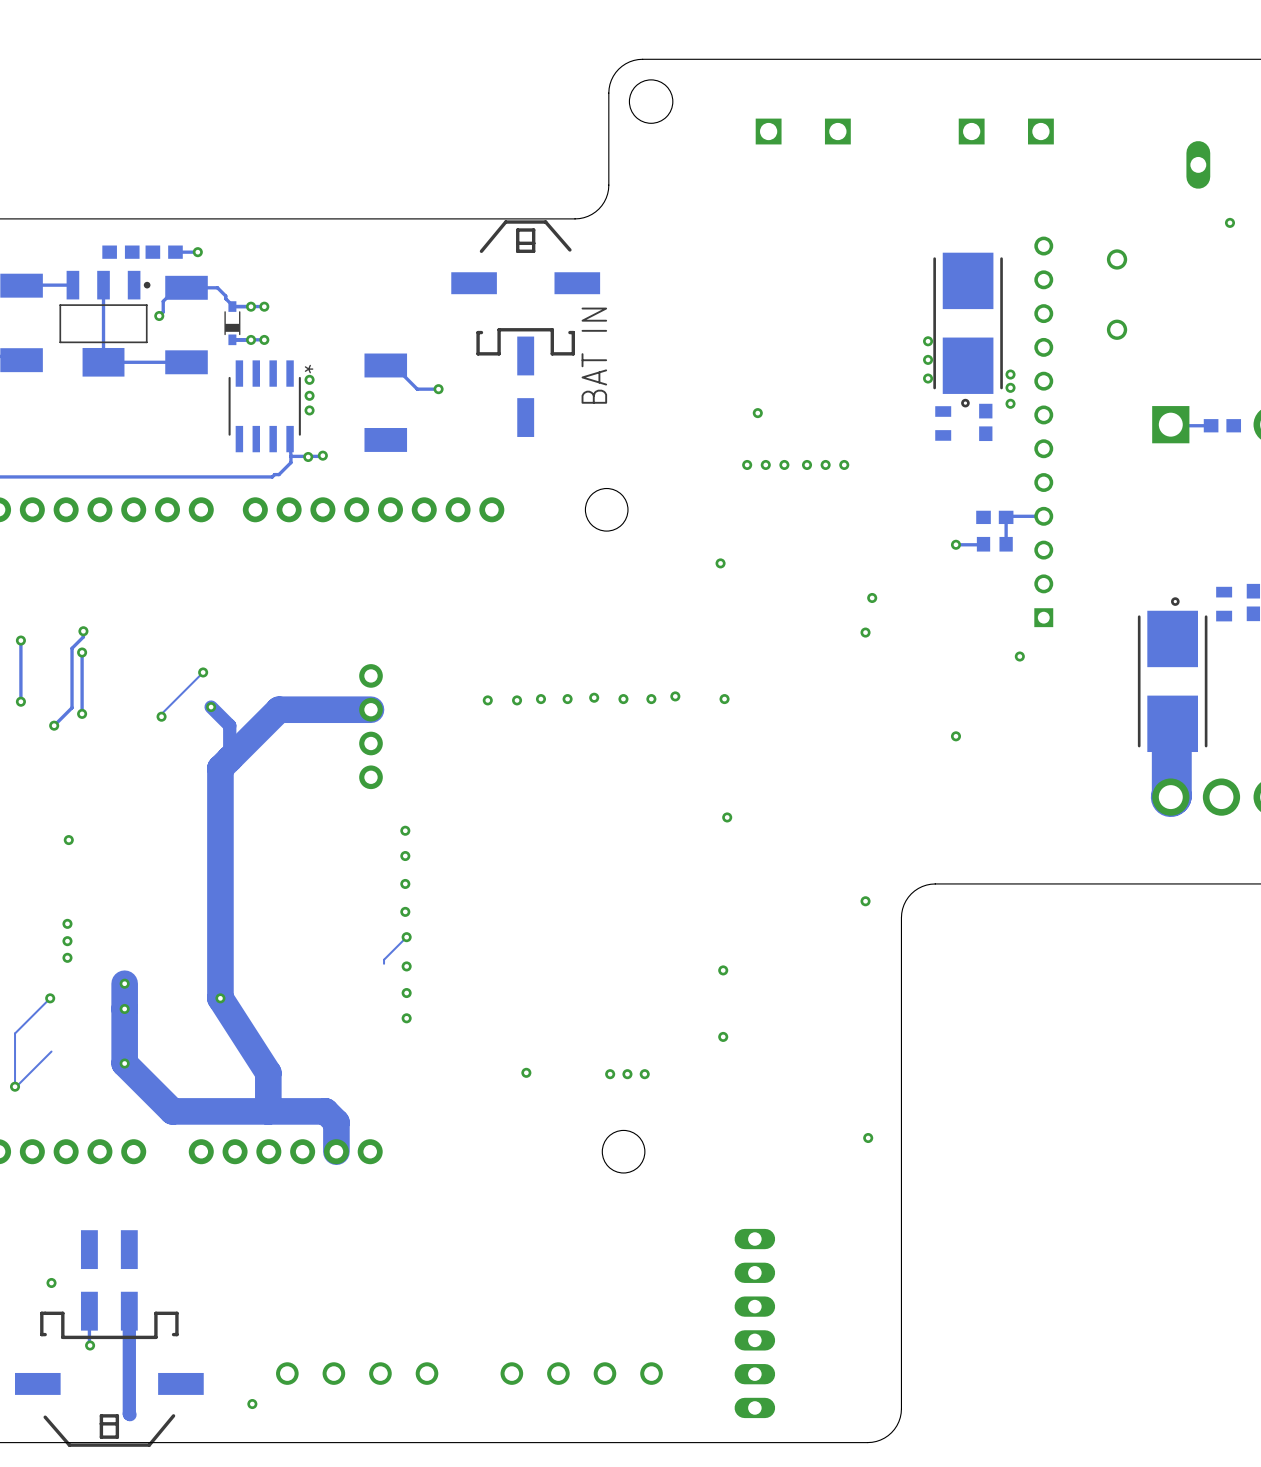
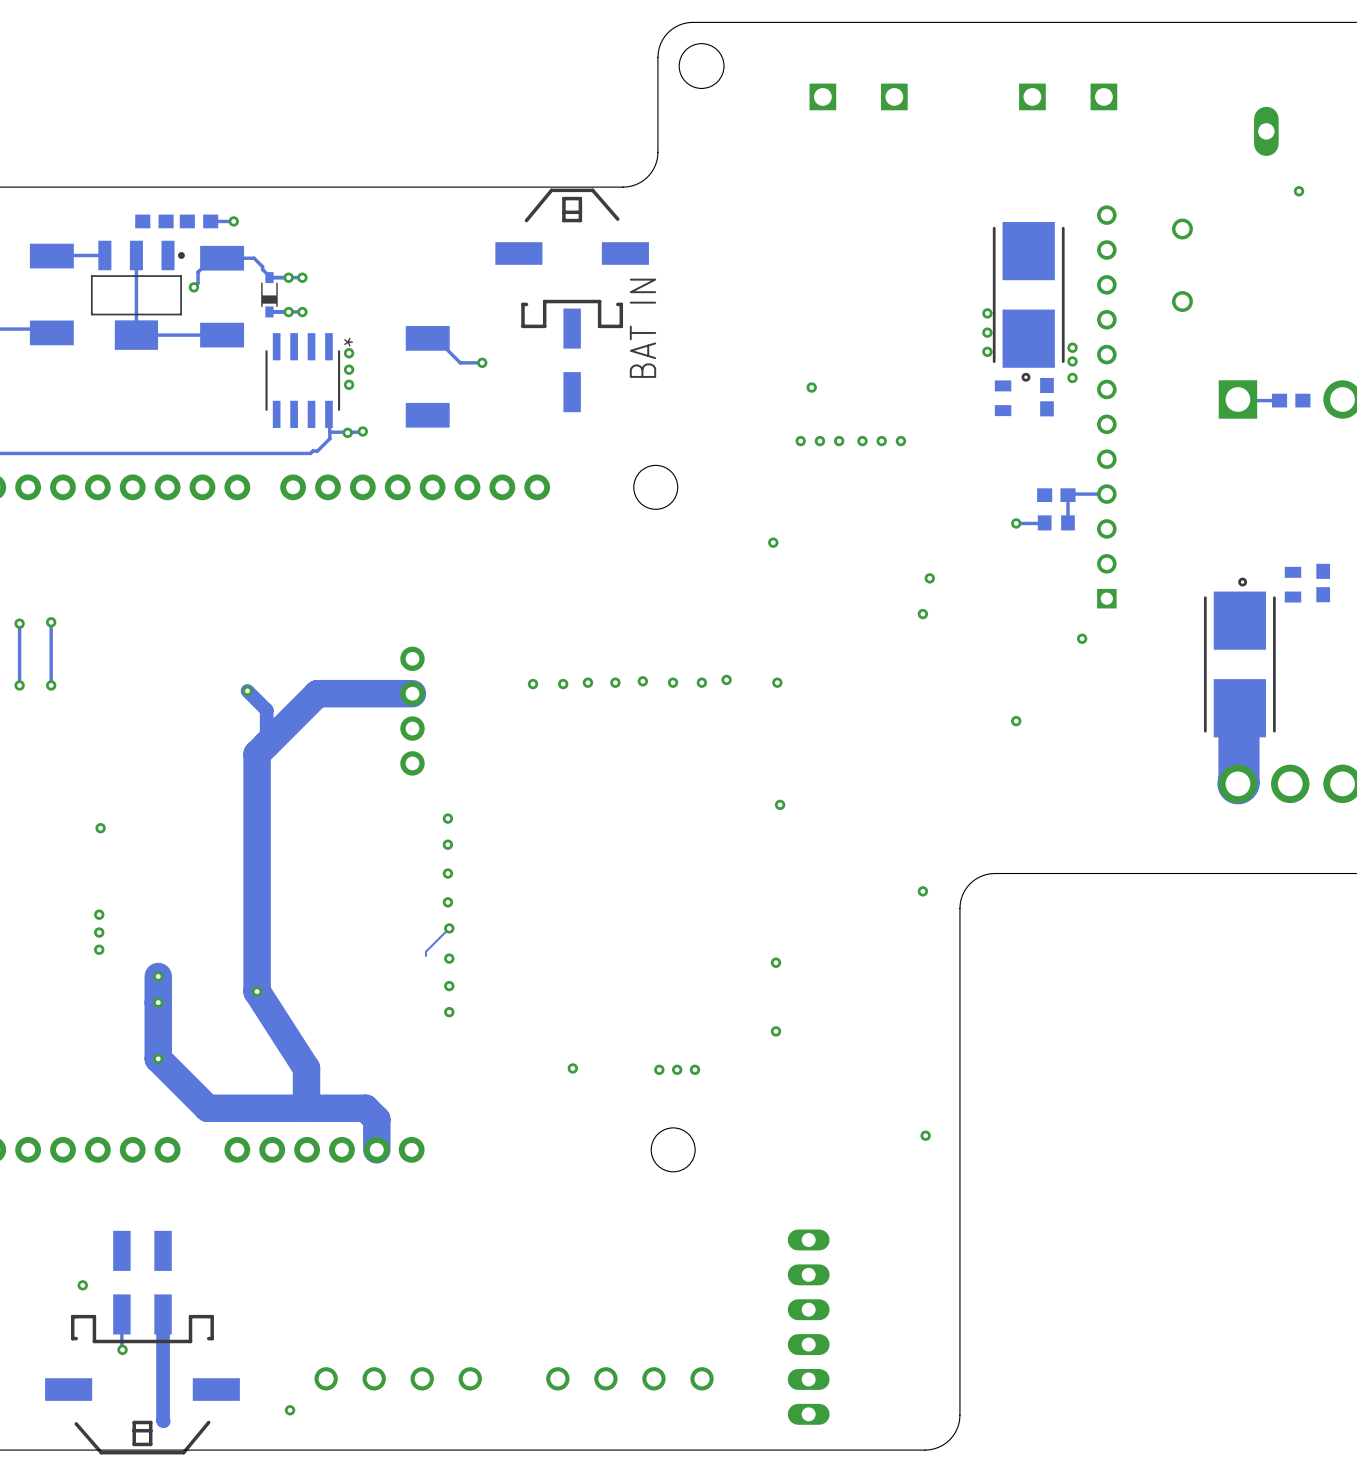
track: (83, 631) (83, 636) (72, 648) (72, 707) (54, 725) -> none
via: (83, 631) -> none
track: (82, 652) (82, 713) -> none
via: (82, 652) -> none
track: (203, 672) (161, 714) (161, 716) -> none
via: (203, 672) -> none
via: (82, 713) -> none
via: (161, 716) -> none
via: (54, 725) -> none
track: (50, 998) (15, 1033) (15, 1086) (51, 1051) -> none
via: (50, 998) -> none
via: (15, 1086) -> none

